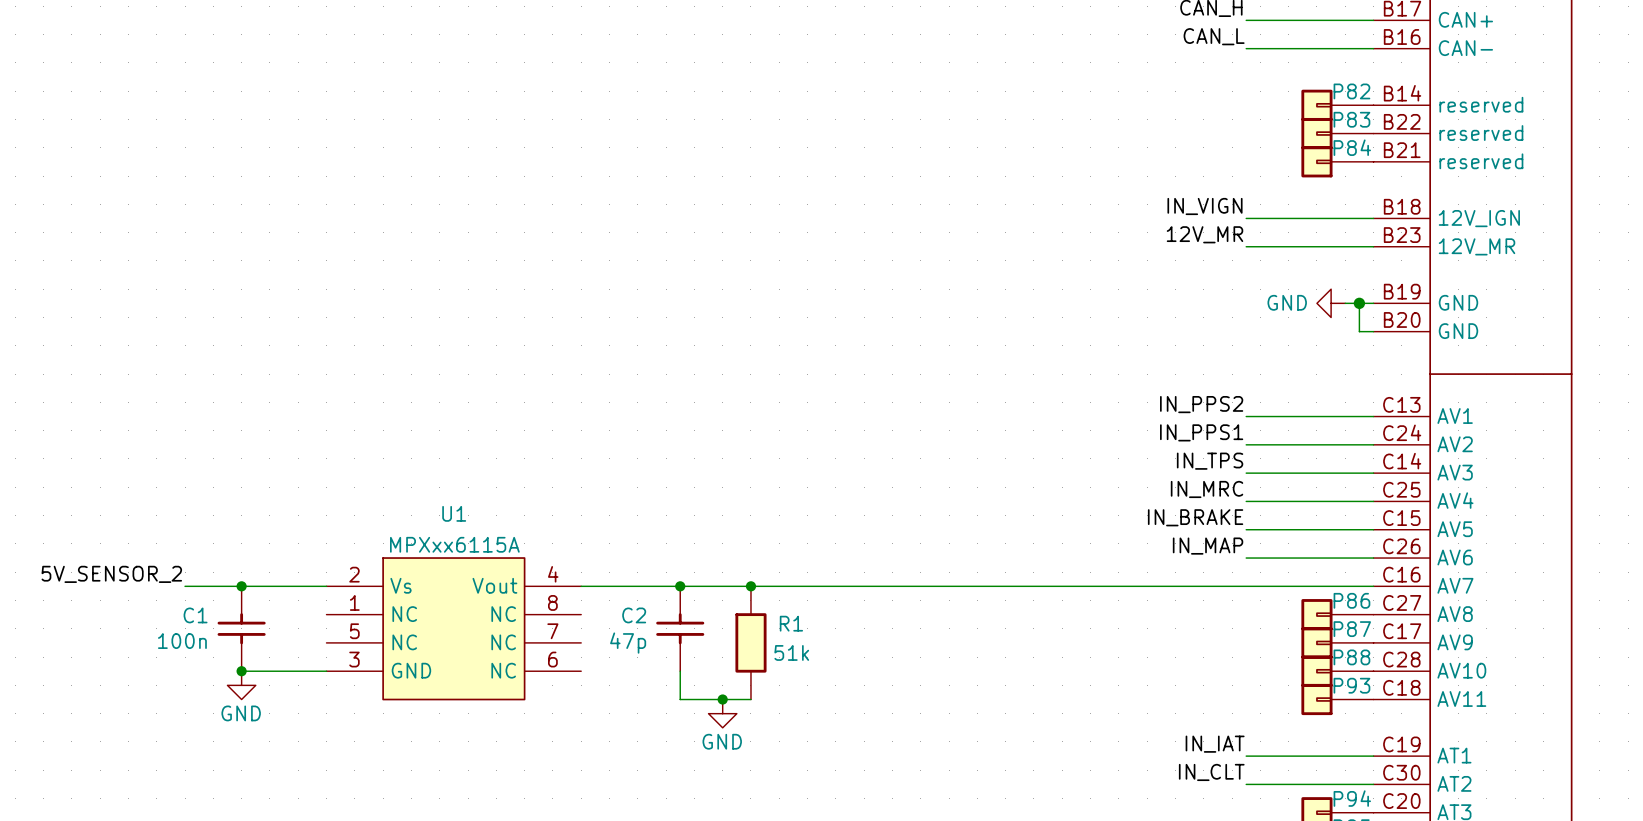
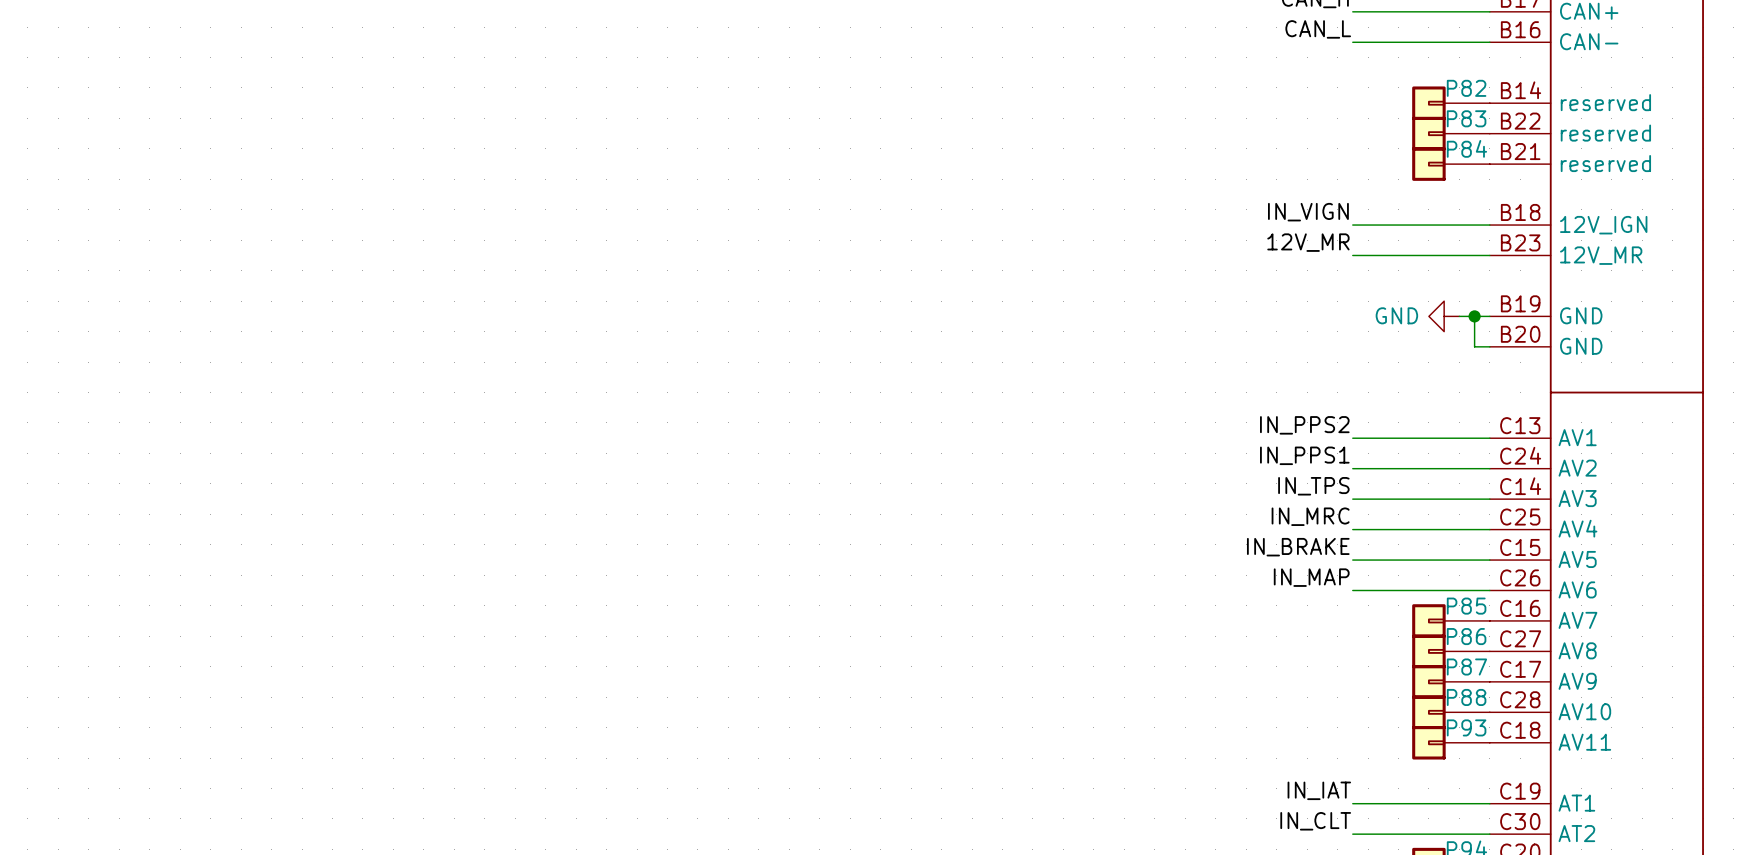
label: 5V_SENSOR_2 (111, 574) -> none
wire: (185, 586) (326, 586) -> none
junction: (241, 586) -> none
wire: (581, 586) (1373, 586) -> none
junction: (680, 586) -> none
junction: (750, 586) -> none
P85: none -> (1451, 620)
C1: 100n (241, 628) -> none
U1: MPXxx6115A (453, 628) -> none
C2: 47p (680, 628) -> none
R1: 51k (750, 642) -> none
wire: (241, 671) (326, 671) -> none
junction: (241, 671) -> none
wire: (680, 671) (680, 699) (750, 699) -> none
power symbol: GND (241, 685) -> none
junction: (722, 699) -> none
power symbol: GND (722, 713) -> none

